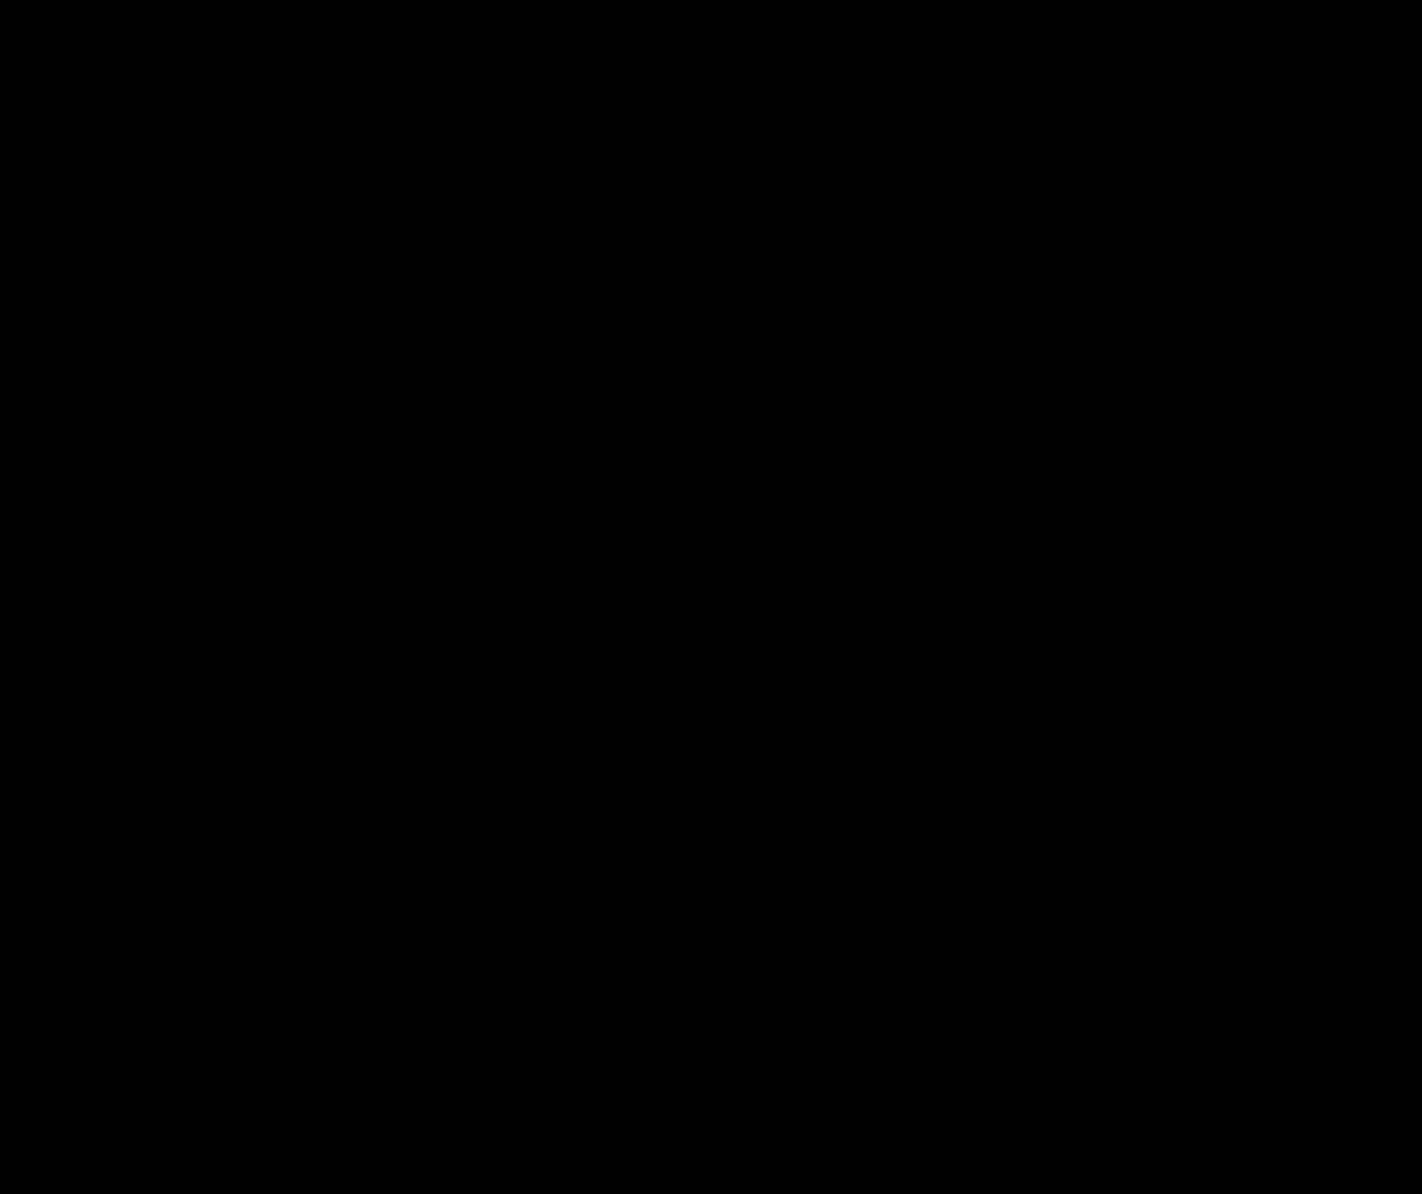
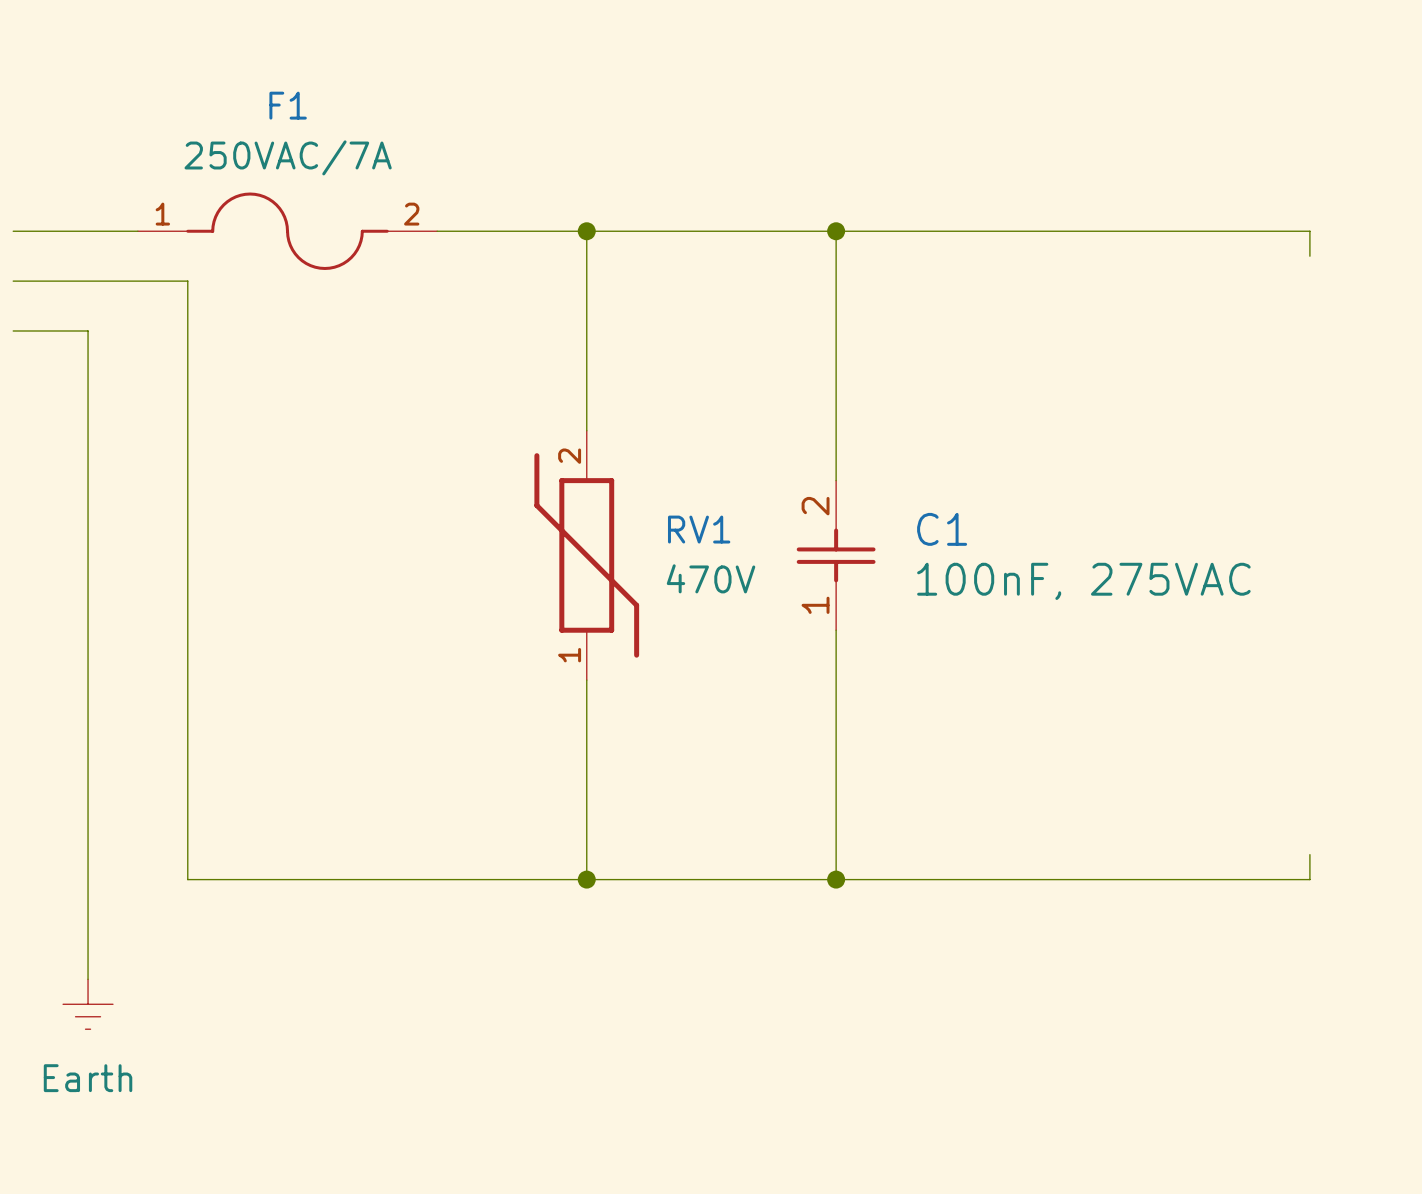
wire: none -> (13, 231) (137, 231)
F1: none -> 250VAC/7A (287, 231)
wire: none -> (437, 231) (1309, 231) (1309, 256)
wire: none -> (586, 231) (586, 430)
junction: none -> (586, 231)
wire: none -> (836, 231) (836, 480)
junction: none -> (836, 231)
wire: none -> (13, 281) (187, 281) (187, 879) (1309, 879) (1309, 854)
wire: none -> (13, 330) (88, 330) (88, 979)
RV1: none -> 470V (586, 555)
C1: none -> 100nF, 275VAC (836, 555)
wire: none -> (836, 630) (836, 879)
wire: none -> (586, 680) (586, 879)
junction: none -> (586, 879)
junction: none -> (836, 879)
power symbol: none -> Earth (88, 1004)

